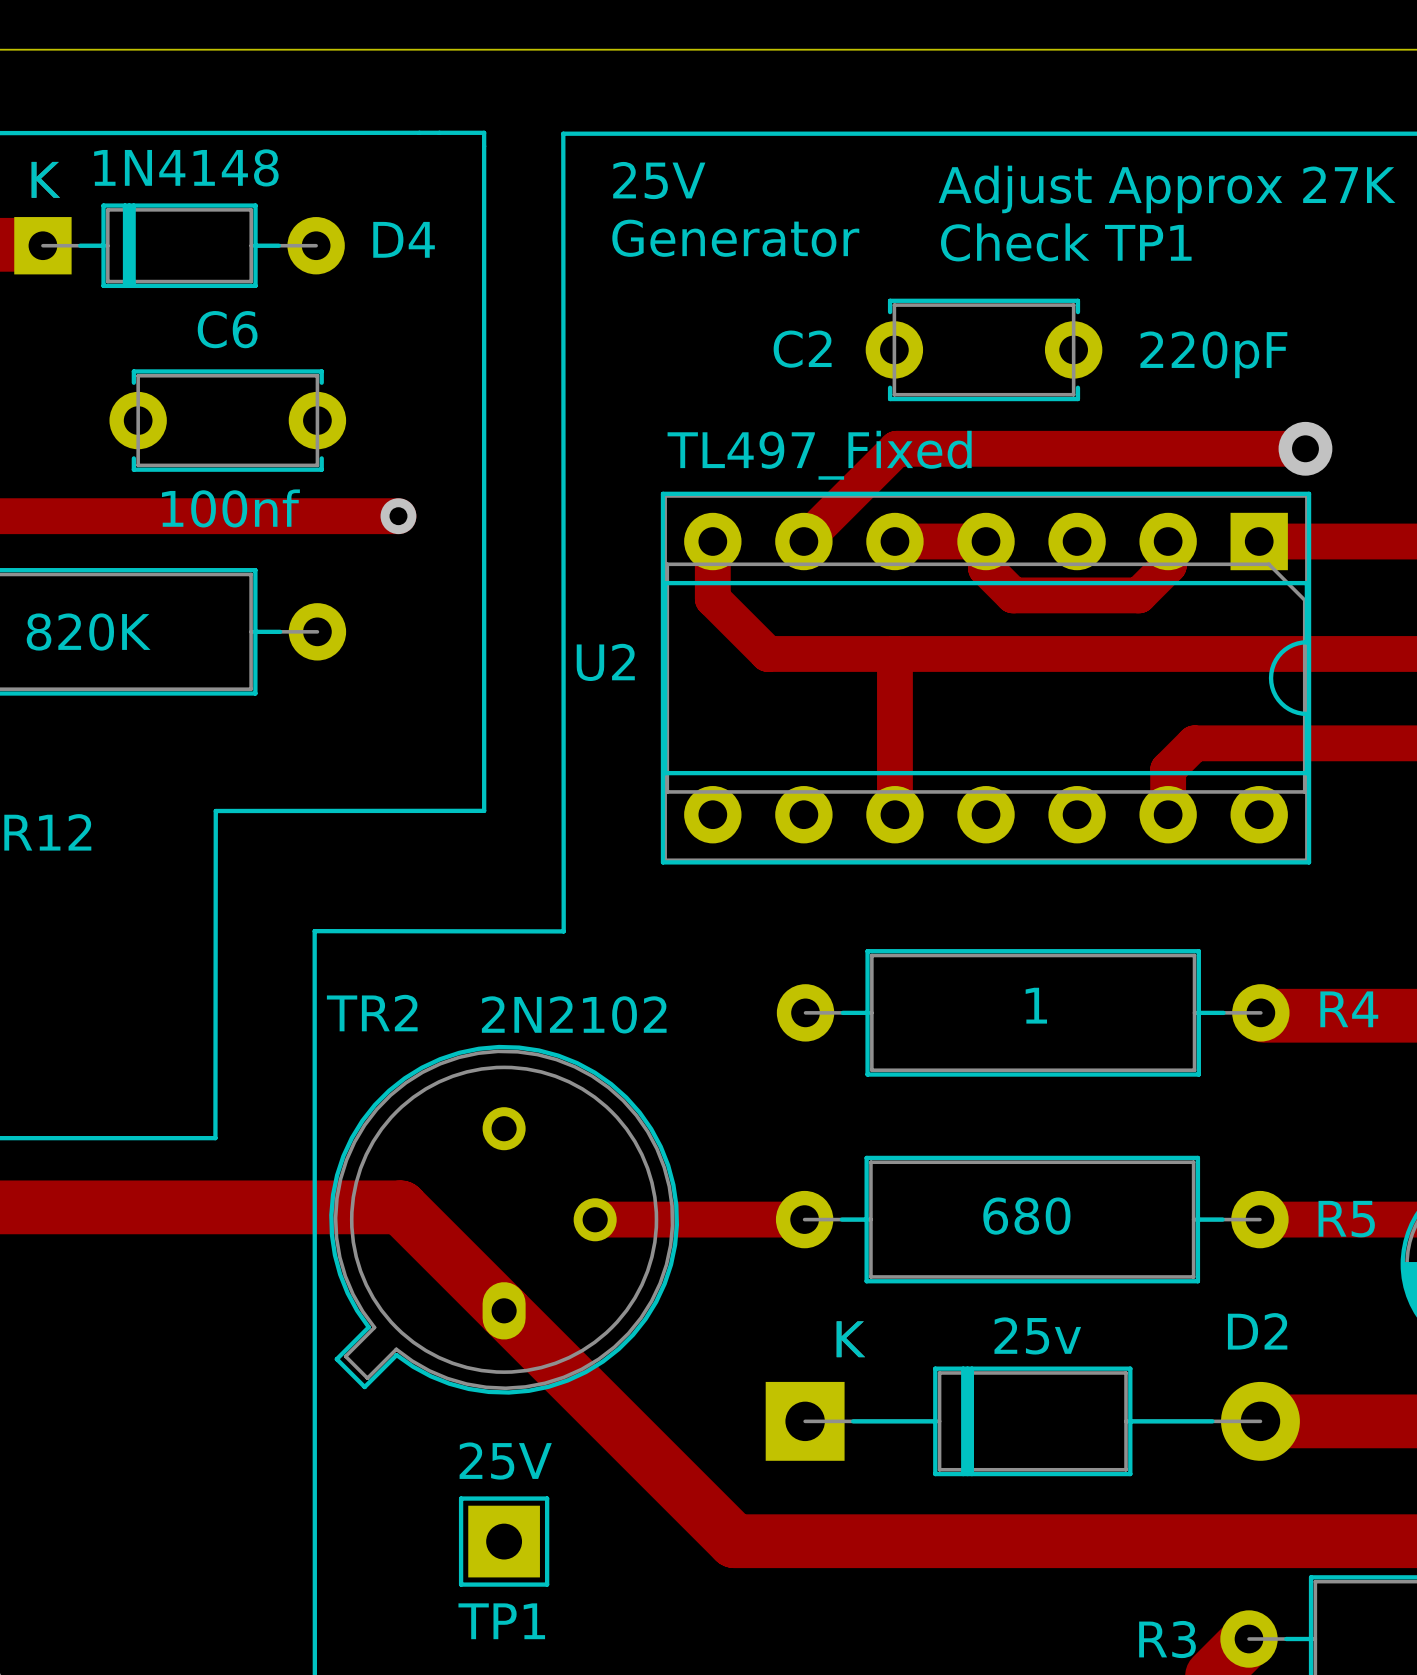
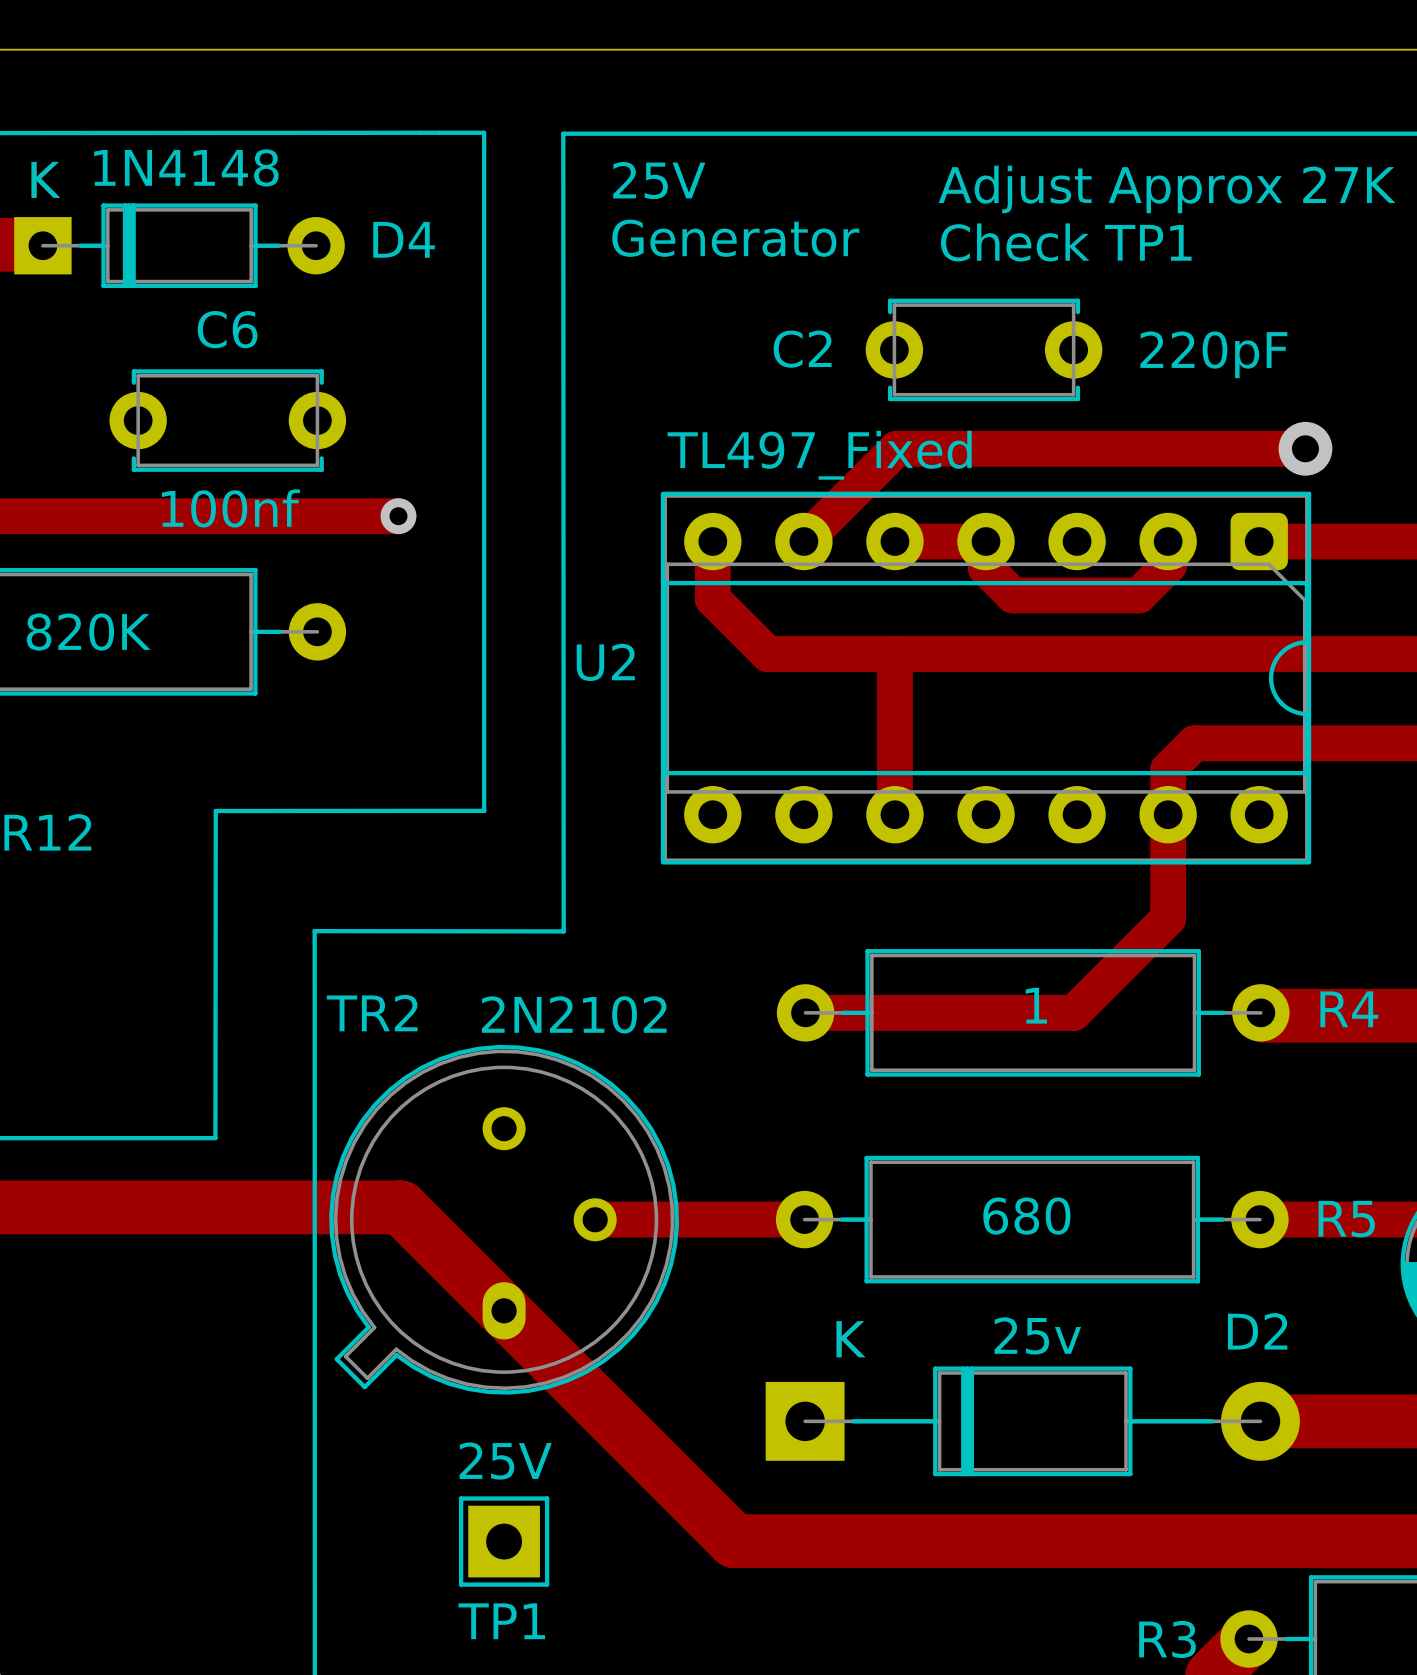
U2 footprint: [660, 491, 1312, 865] -> [660, 491, 1312, 865]
track: none -> (1168, 814) (1168, 918) (1073, 1012) (805, 1012)

